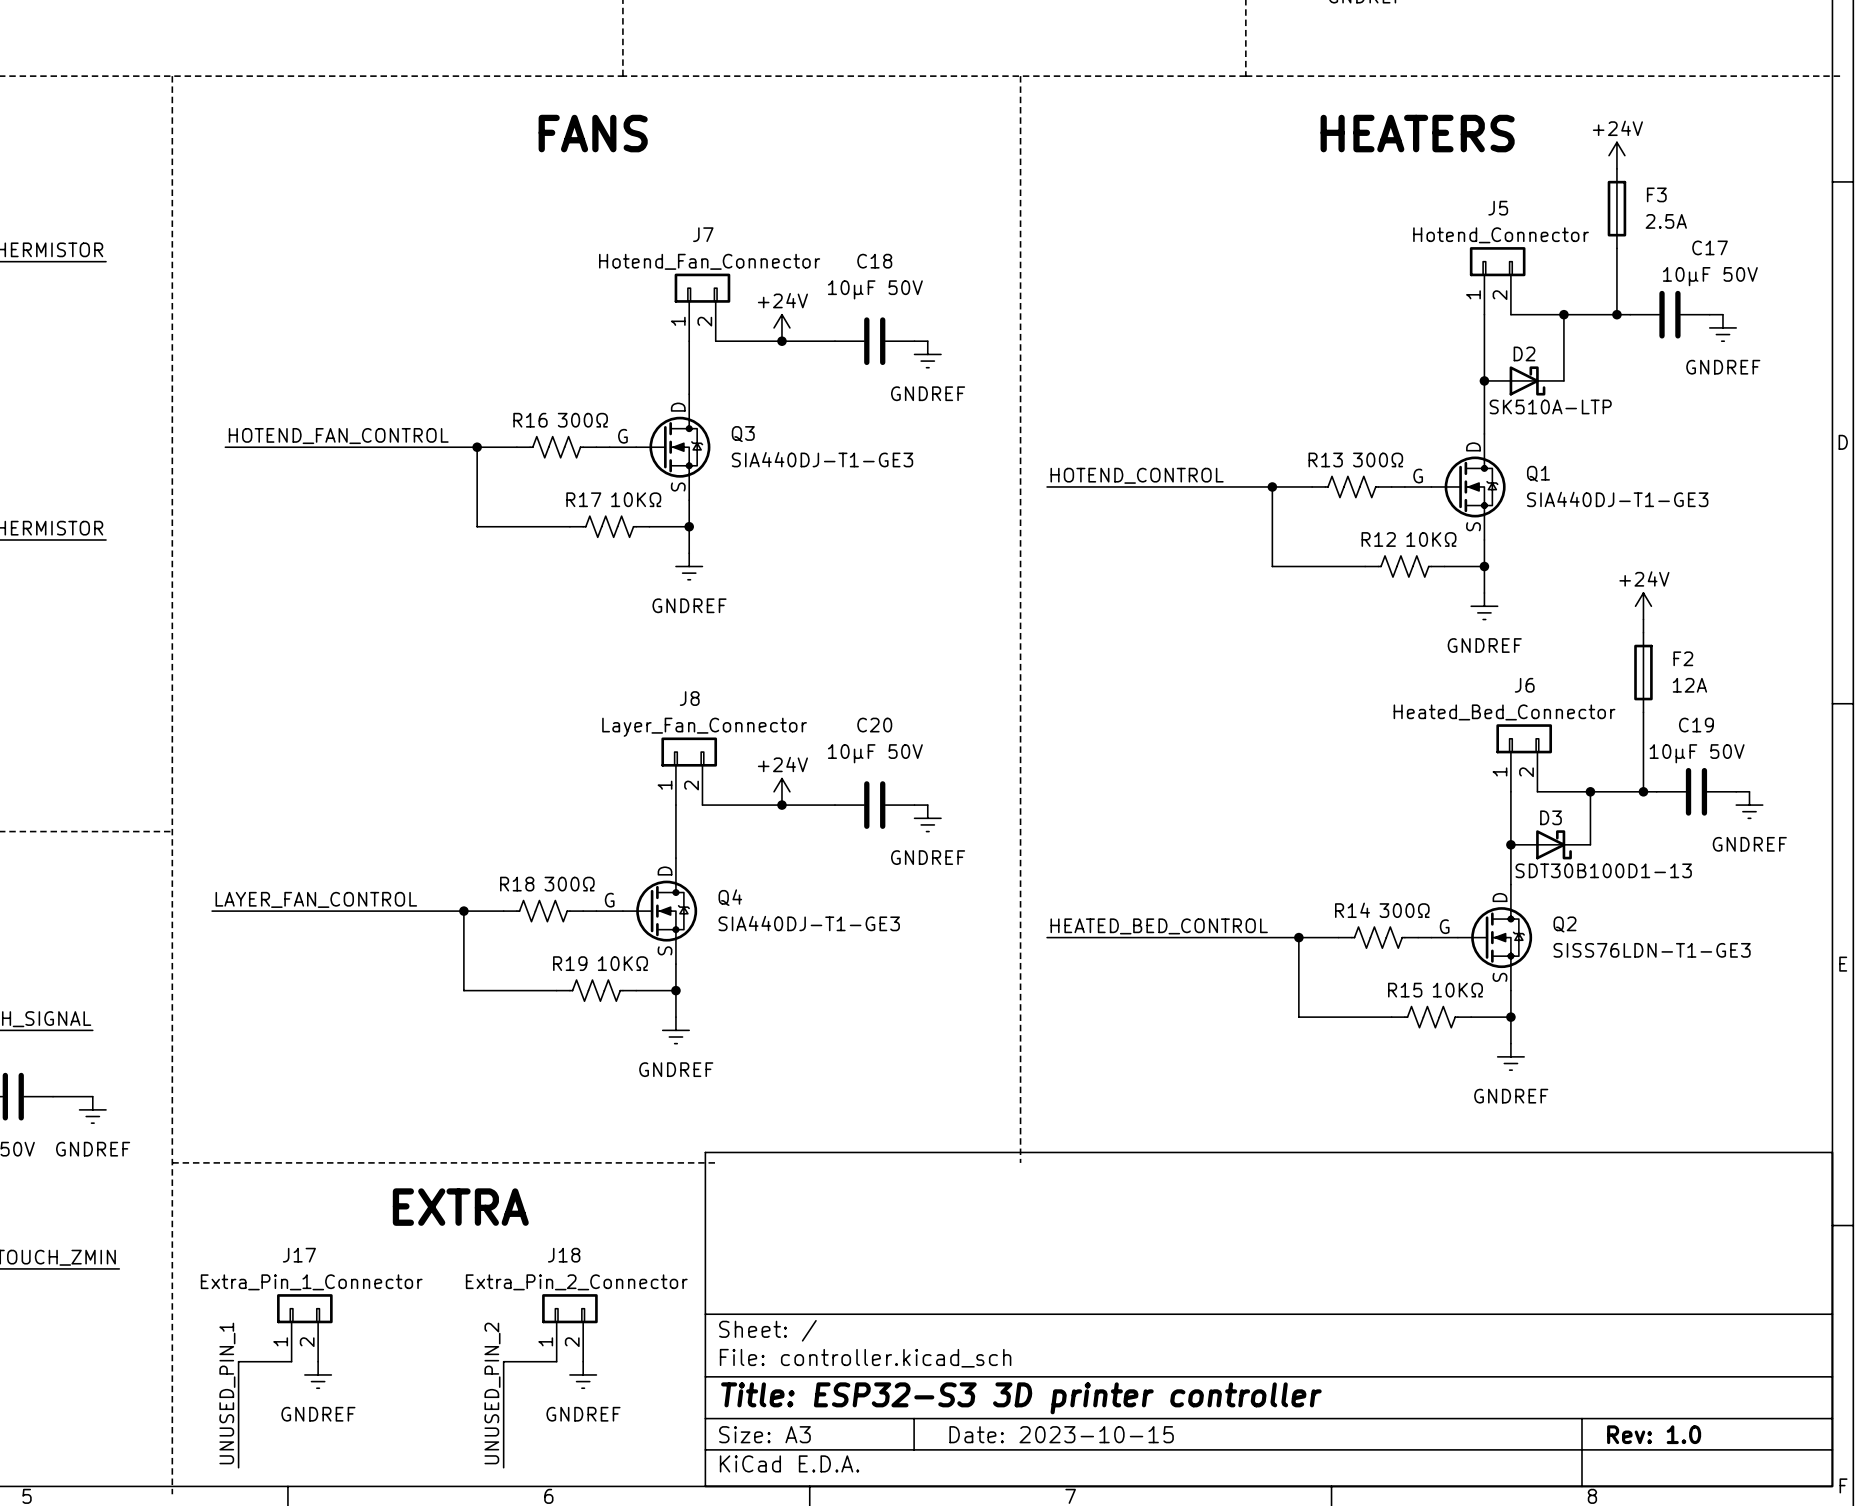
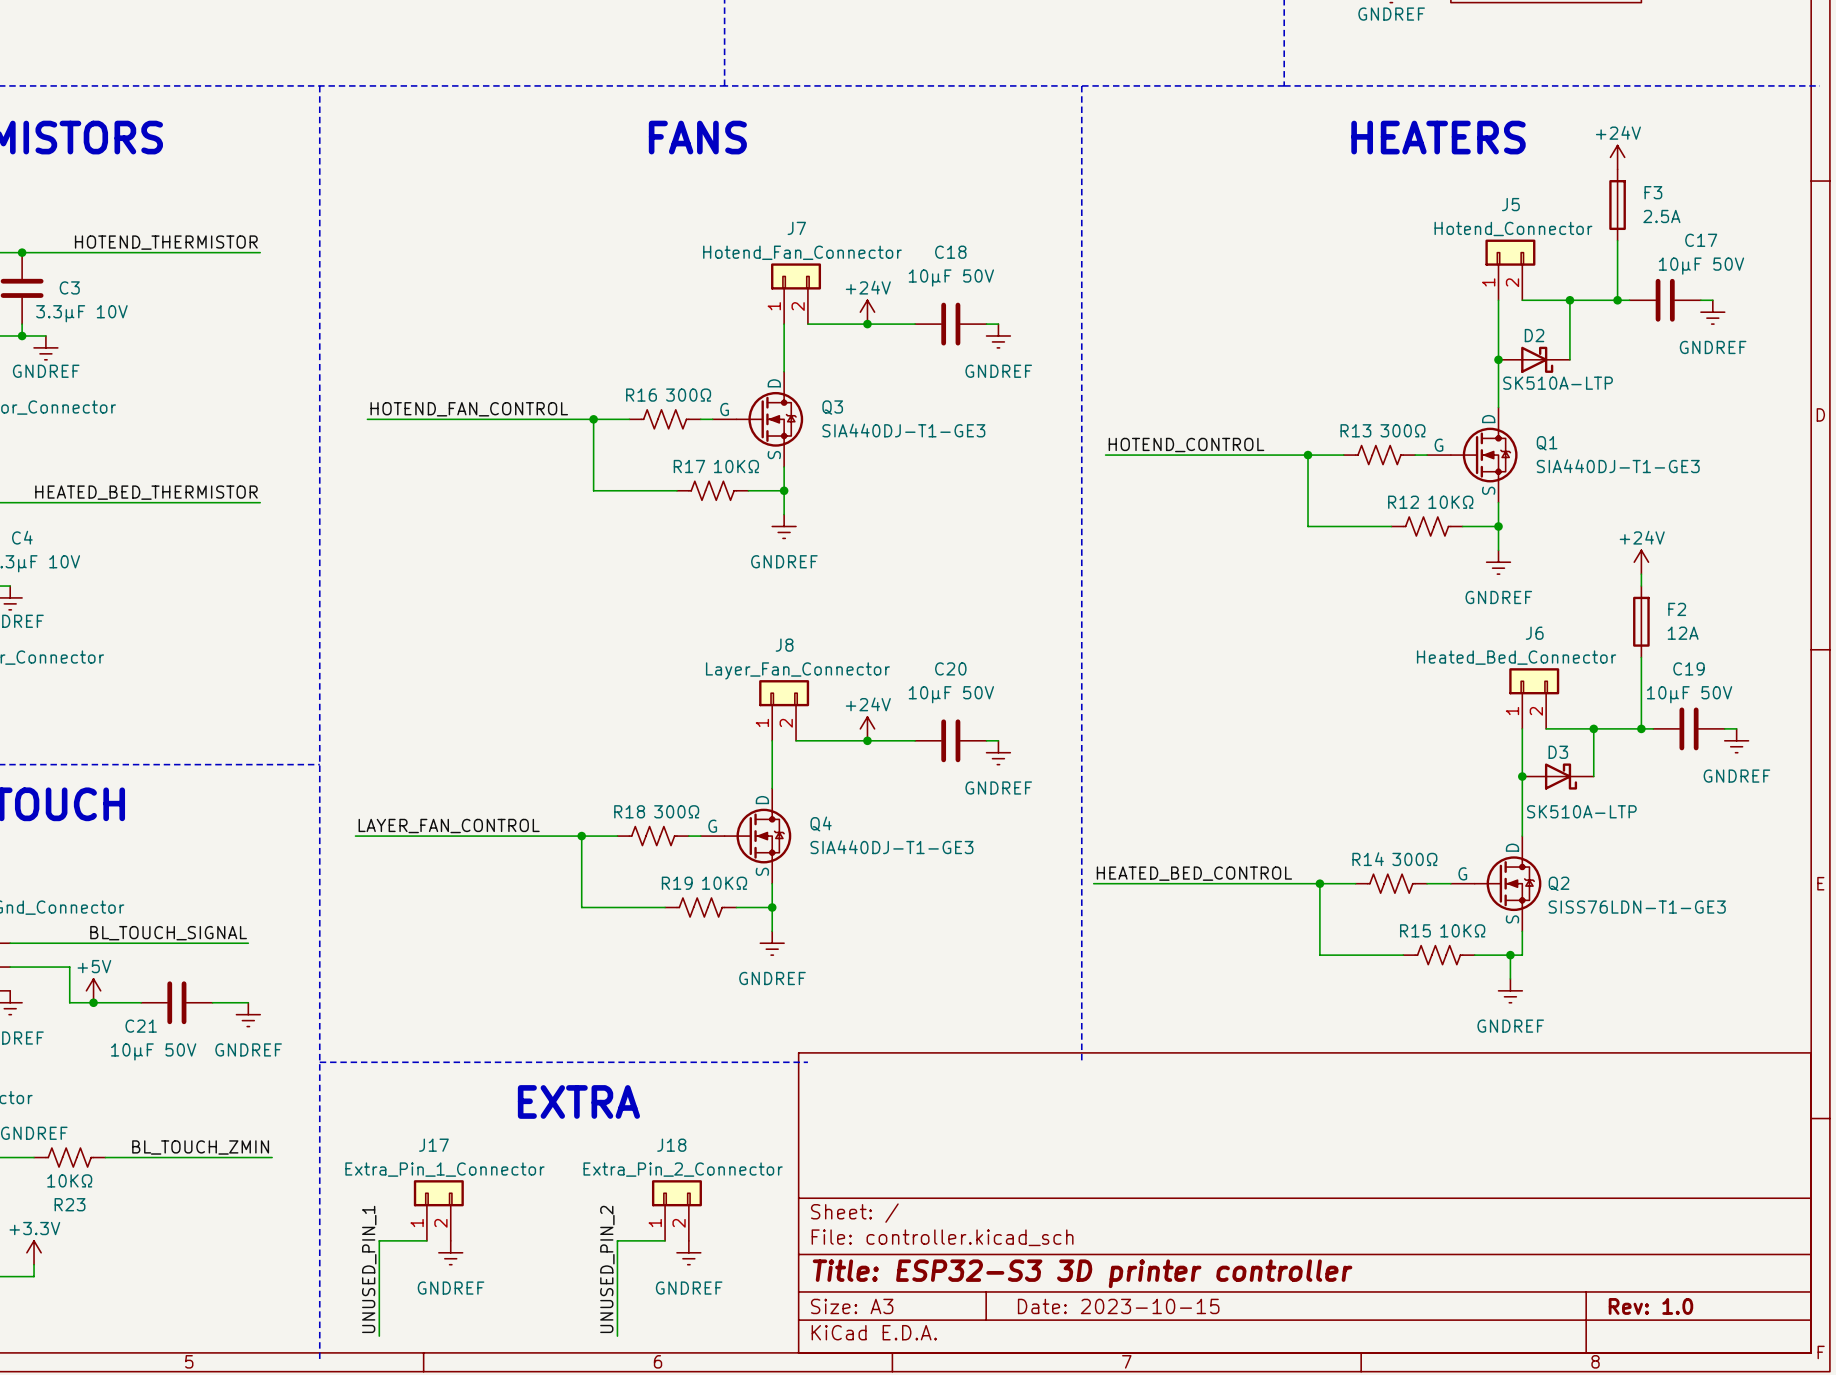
D3 value: SDT30B100D1-13 (1603, 870) -> SK510A-LTP (1581, 811)
Q2 name position: Q2 (1564, 924) -> Q2 (1558, 883)
label position: HEATED_BED_CONTROL (1159, 926) -> HEATED_BED_CONTROL (1194, 873)
wire: (1047, 937) (1338, 937) -> (1093, 883) (1355, 883)
wire: (1298, 937) (1298, 1017) (1391, 1017) -> (1319, 883) (1319, 955) (1403, 955)
junction position: (1298, 937) -> (1319, 883)
R14 position: (1378, 937) -> (1391, 883)
wire: (1418, 937) (1431, 937) -> none
Q2 position: (1481, 937) -> (1496, 883)
Q2 value position: SISS76LDN-T1-GE3 (1652, 950) -> SISS76LDN-T1-GE3 (1637, 907)
wire: none -> (1427, 883) (1450, 883)
wire: (1510, 990) (1510, 1017) (1471, 1017) -> none
R15 position: (1431, 1017) -> (1438, 955)
junction position: (1510, 1017) -> (1510, 955)
wire: none -> (1474, 955) (1522, 955)
wire: none -> (1510, 955) (1510, 978)
power symbol position: GNDREF (1510, 1056) -> GNDREF (1510, 990)

